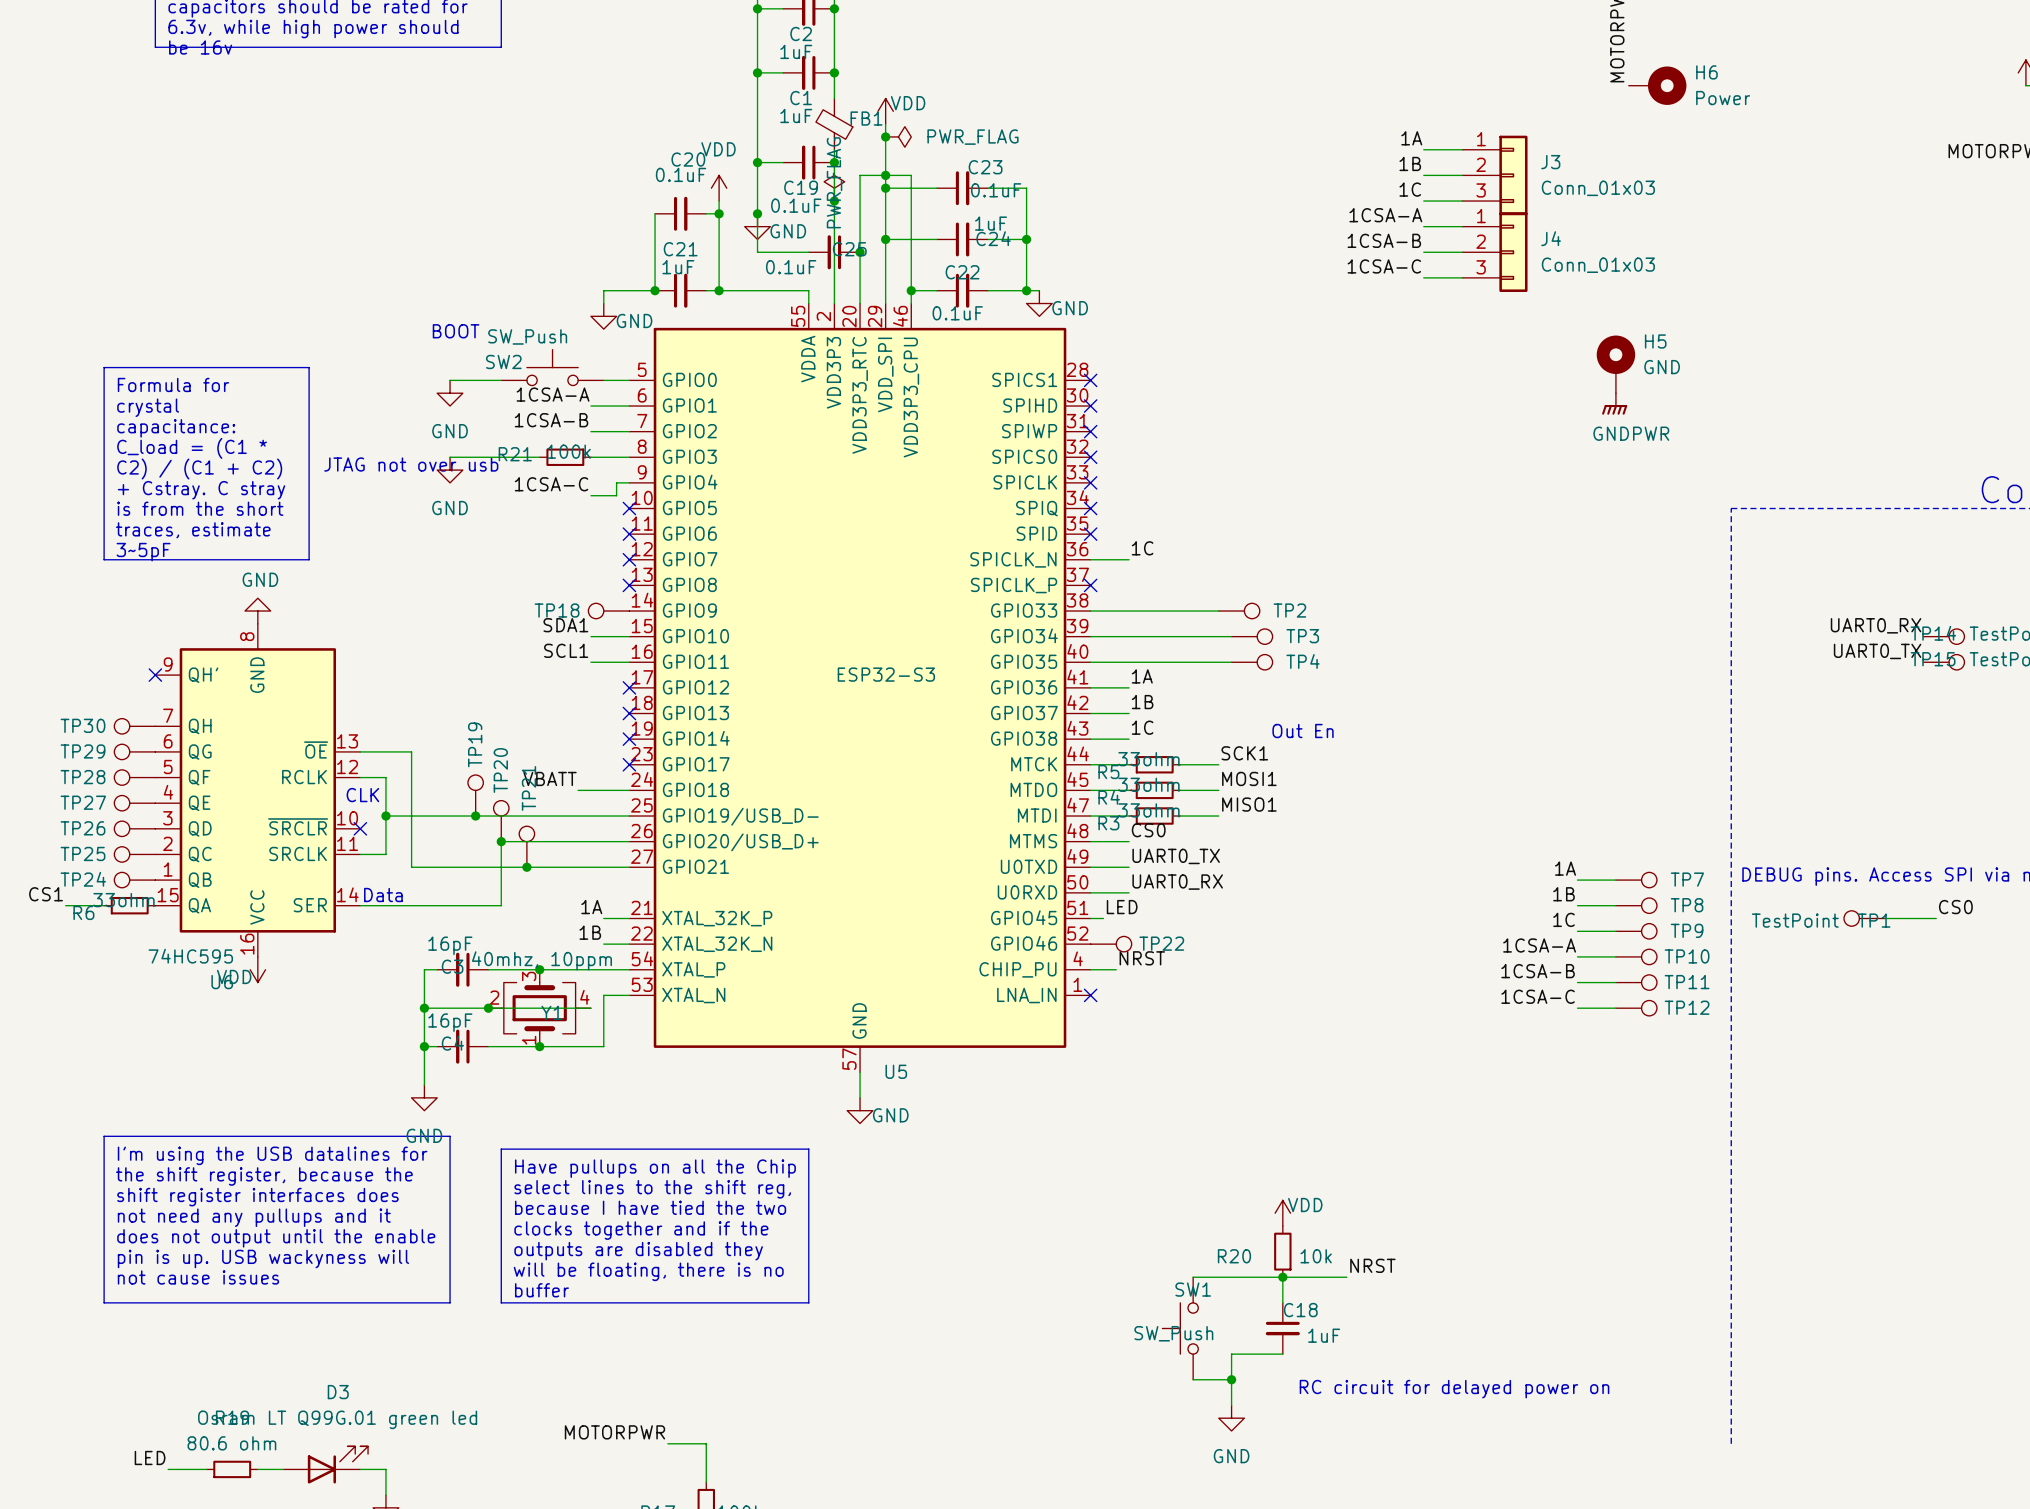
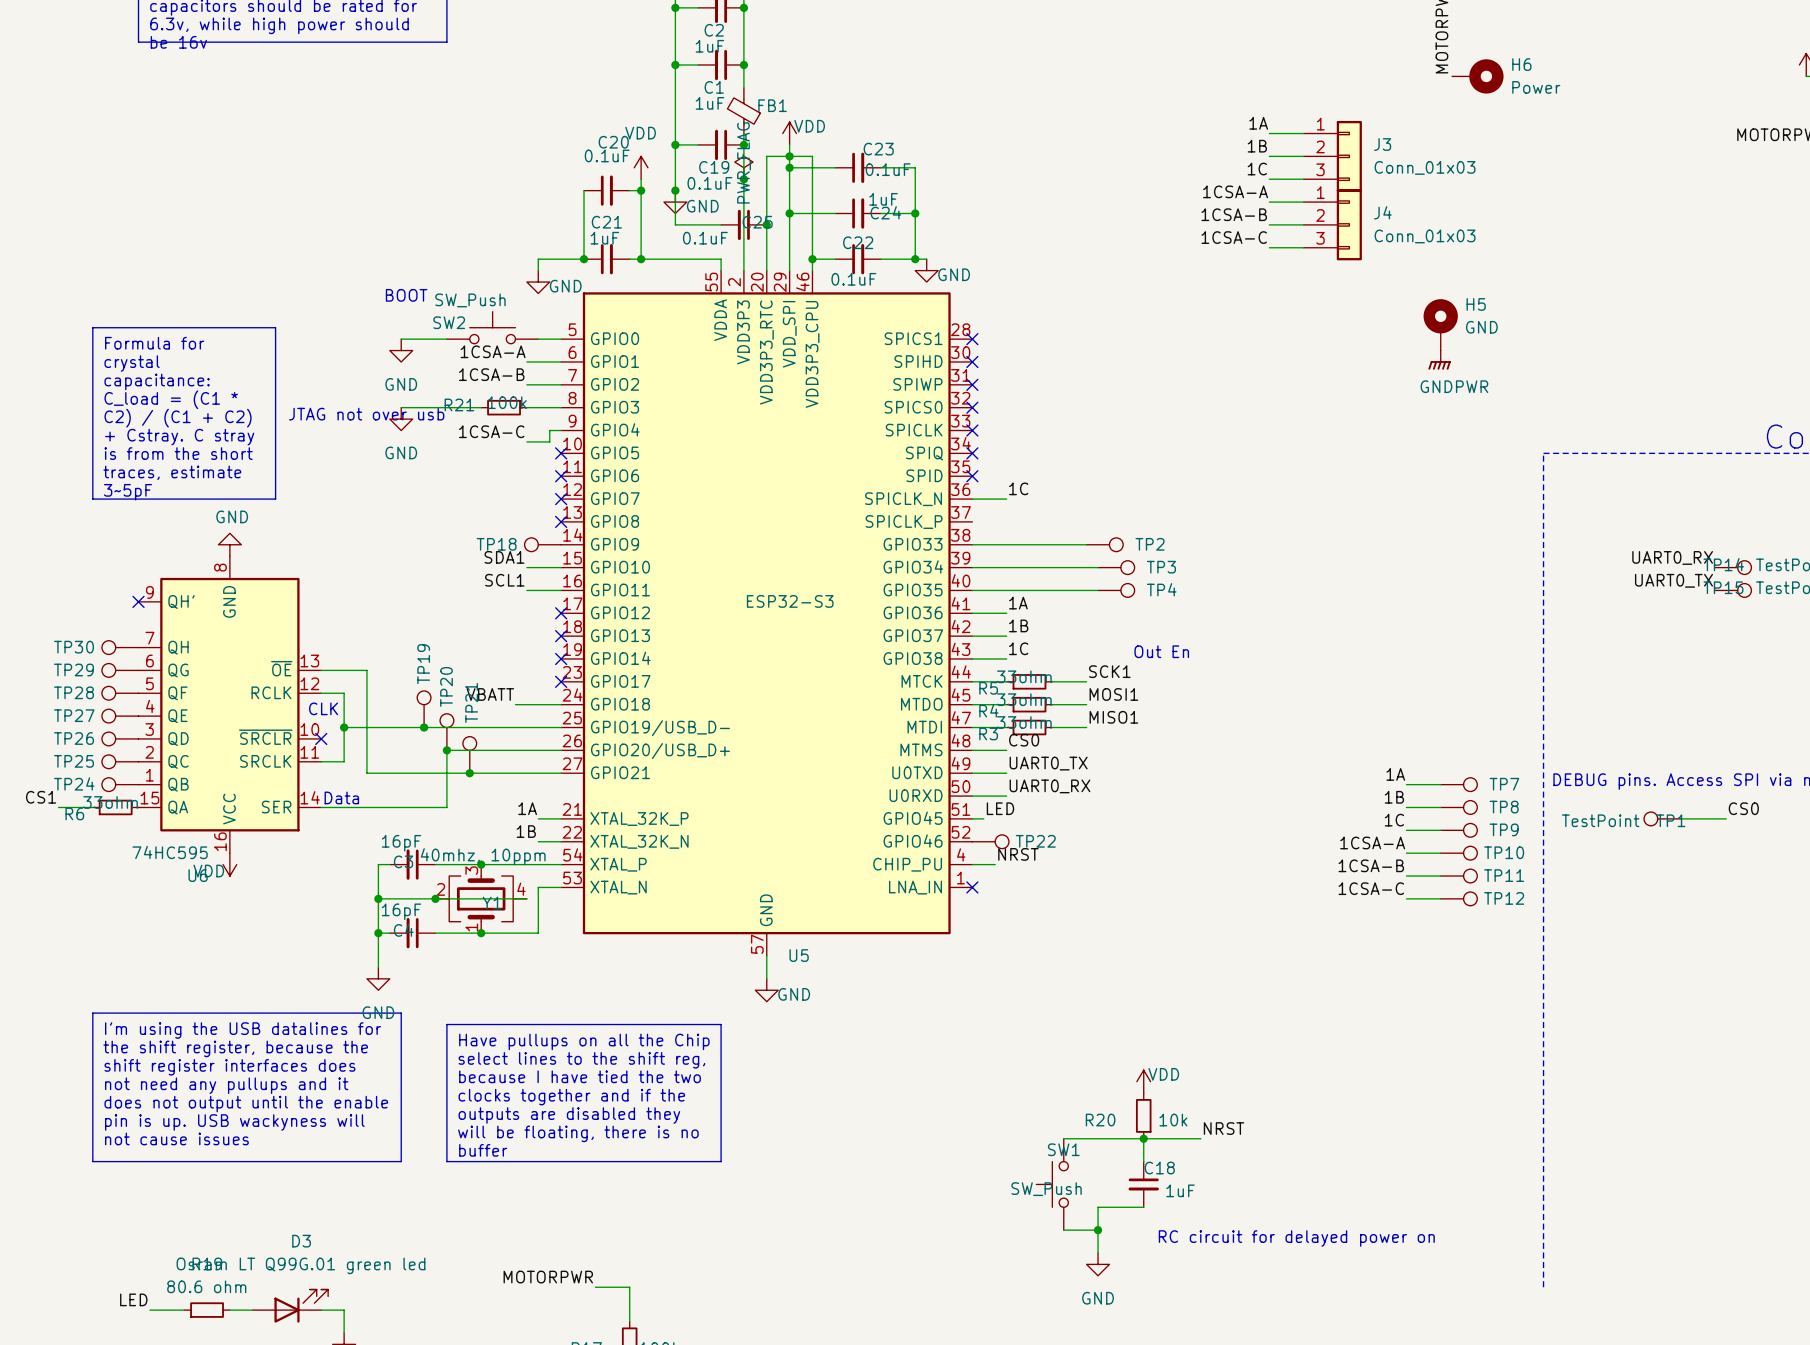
power symbol position: VDD (885, 111) -> VDD (789, 133)
junction: (885, 136) -> none
power symbol: PWR_FLAG (898, 136) -> none
no-connect mark: (1090, 585) -> none

